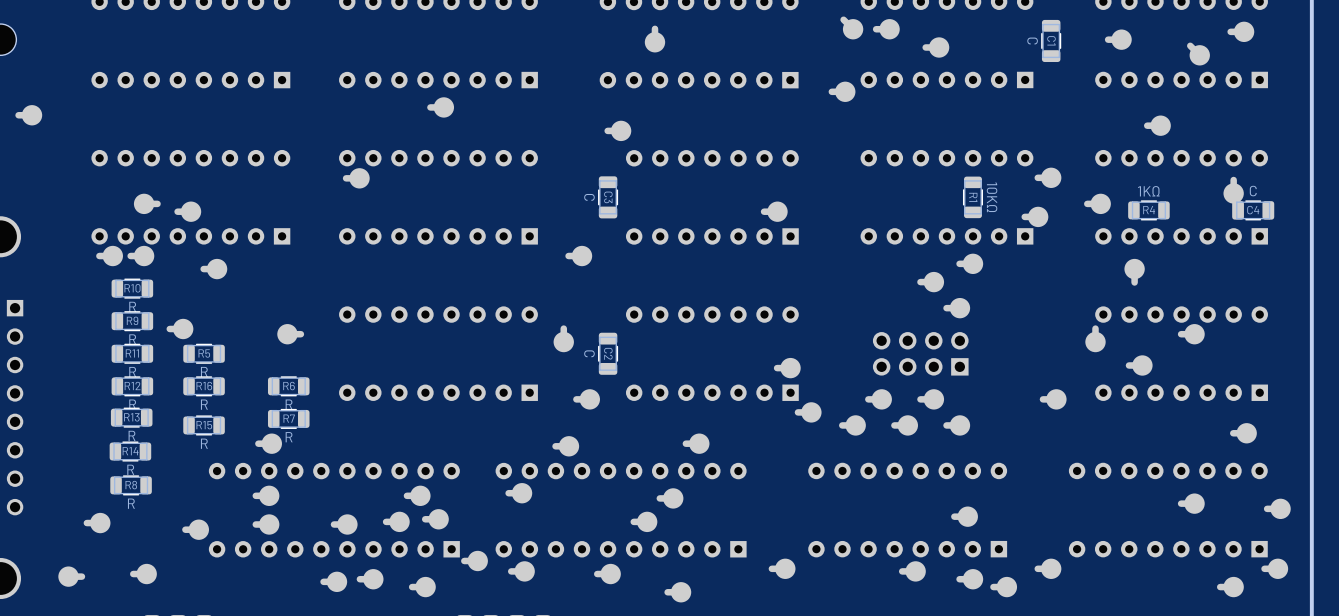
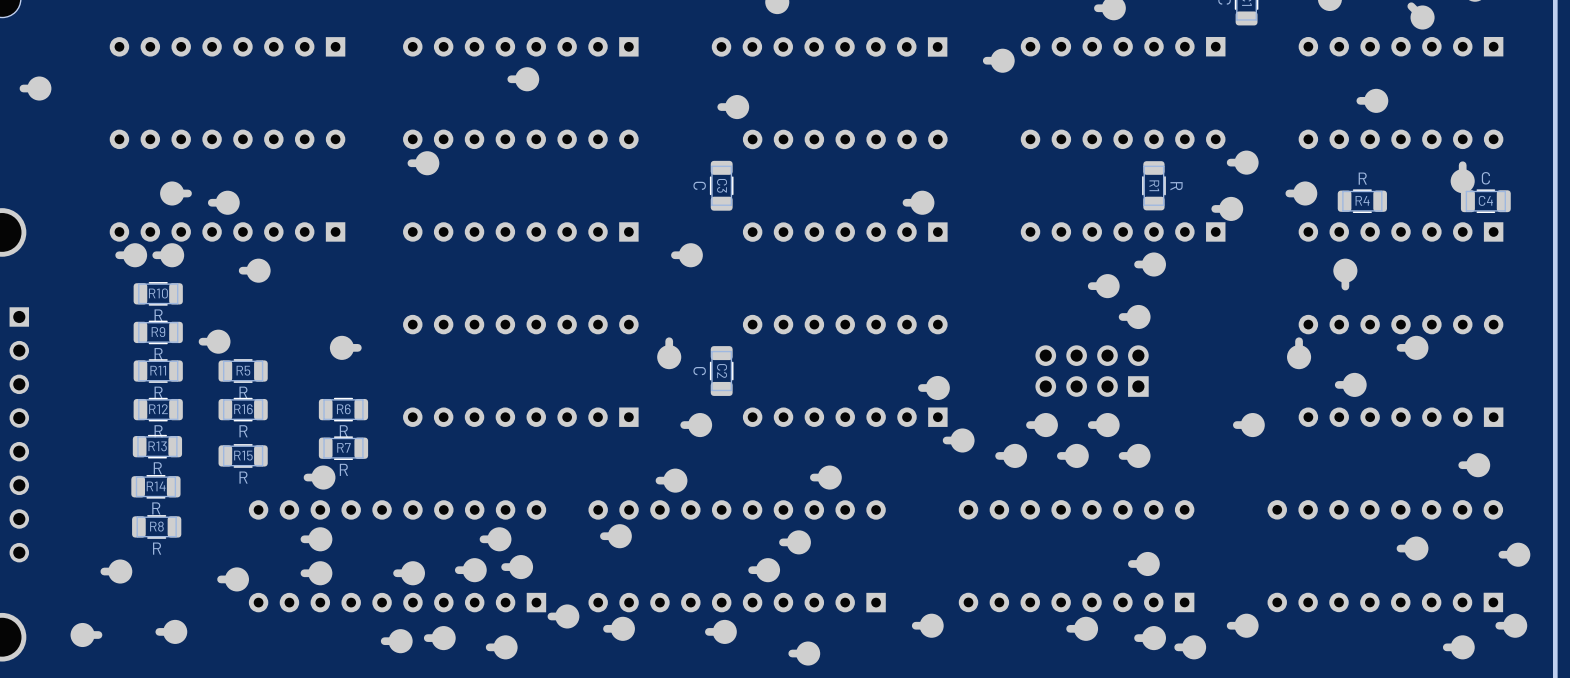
R4 value: 1KΩ (1148, 191) -> R (1362, 178)
R1 value: 10KΩ (992, 197) -> R (1176, 186)

